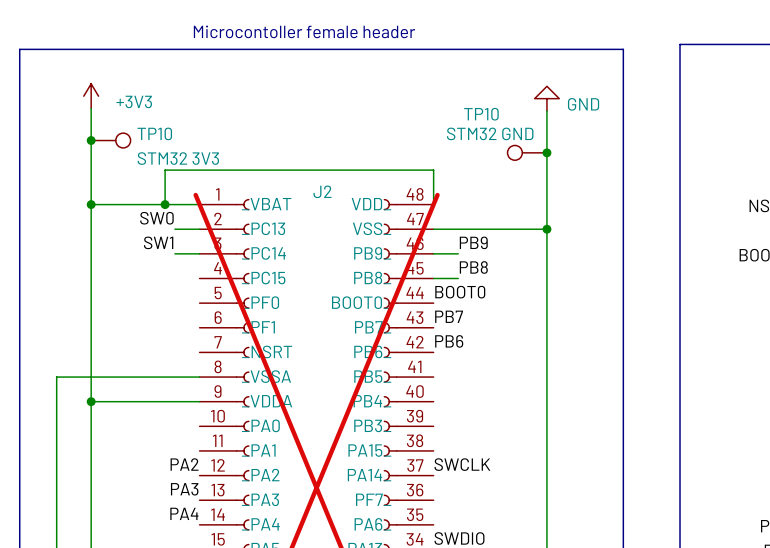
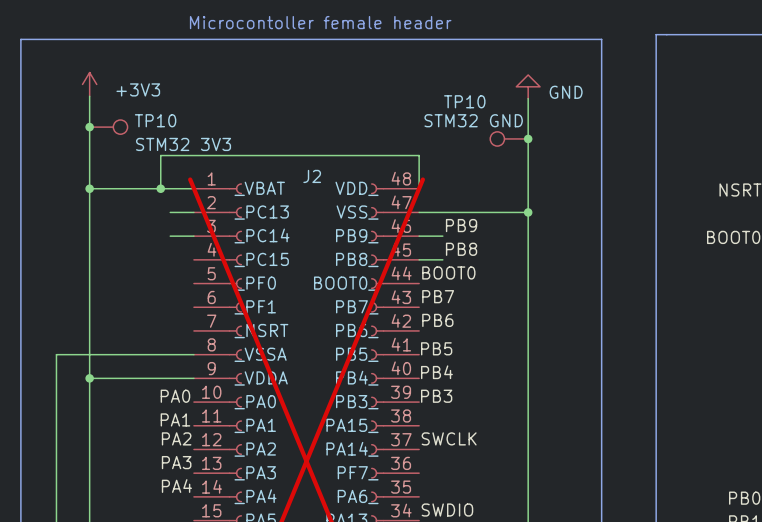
label: SW0 (156, 218) -> none
label: SW1 (158, 242) -> none
label: none -> PB5 (436, 348)
label: none -> PB4 (436, 372)
label: none -> PA0 (175, 396)
label: none -> PB3 (436, 396)
label: none -> PA1 (175, 419)

